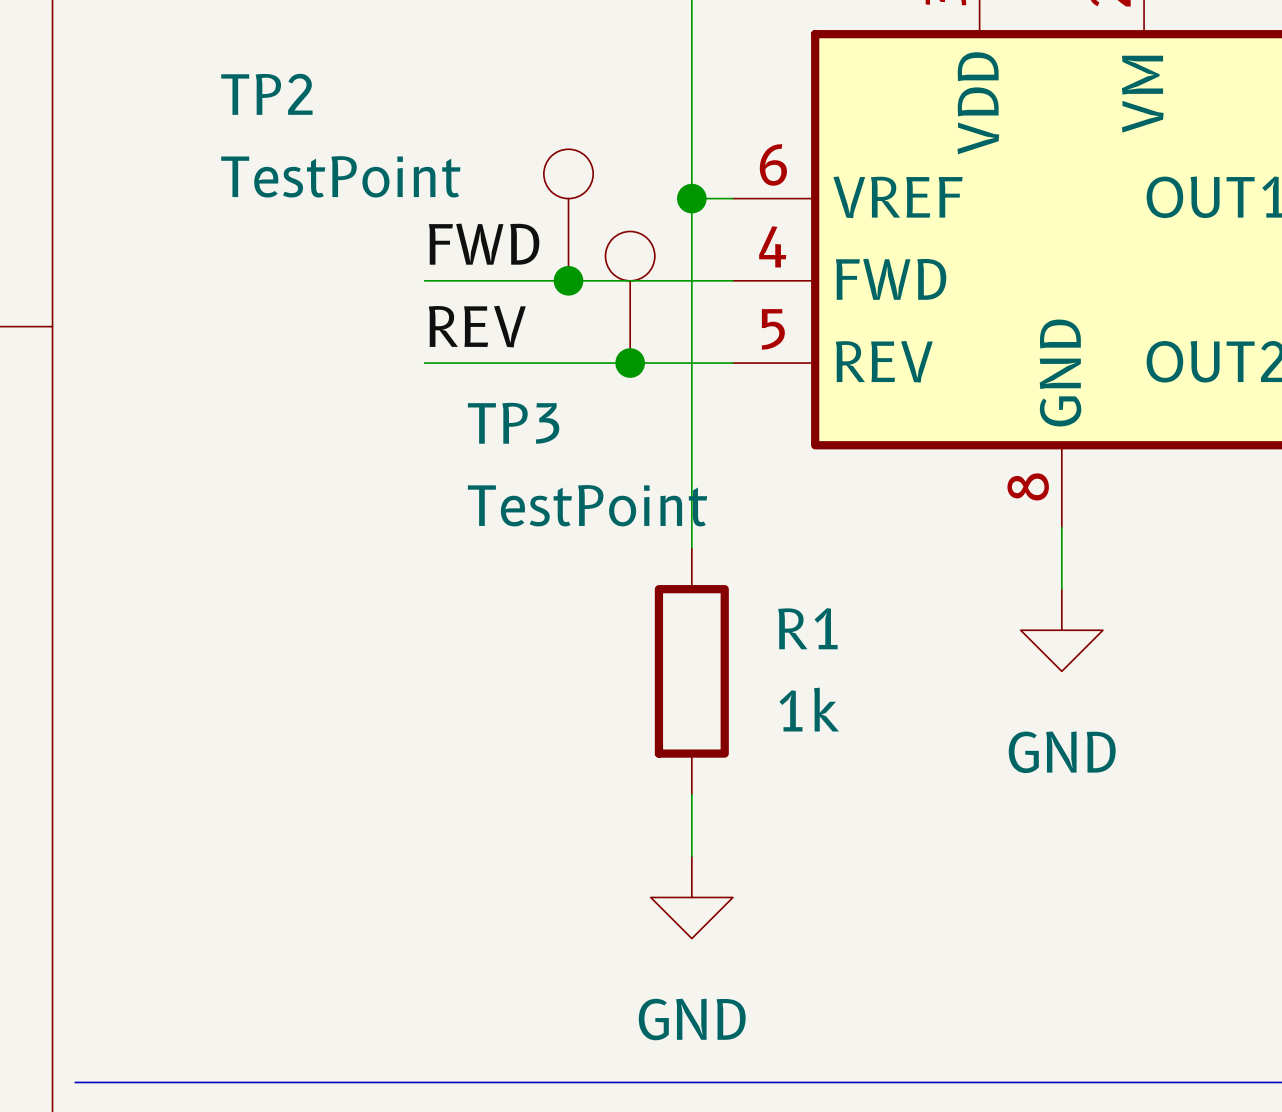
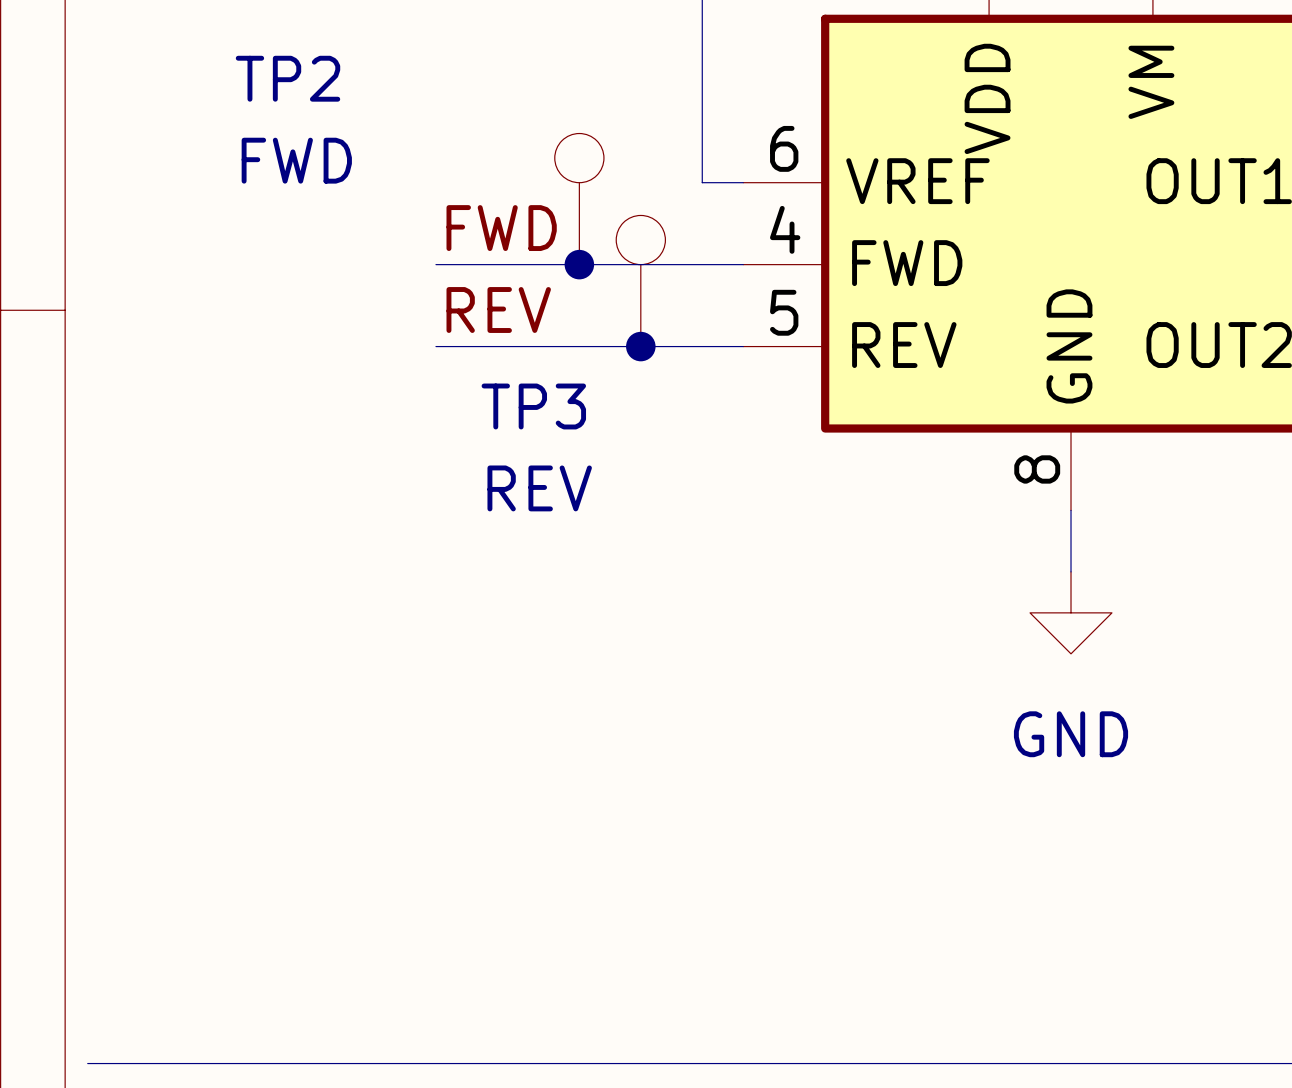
TP2 value: TestPoint (340, 176) -> FWD (296, 160)
wire: (691, 198) (691, 548) -> none
junction: (691, 198) -> none
TP3 value: TestPoint (587, 505) -> REV (539, 488)
R1: 1k (691, 671) -> none
wire: (691, 794) (691, 856) -> none
power symbol: GND (691, 897) -> none

